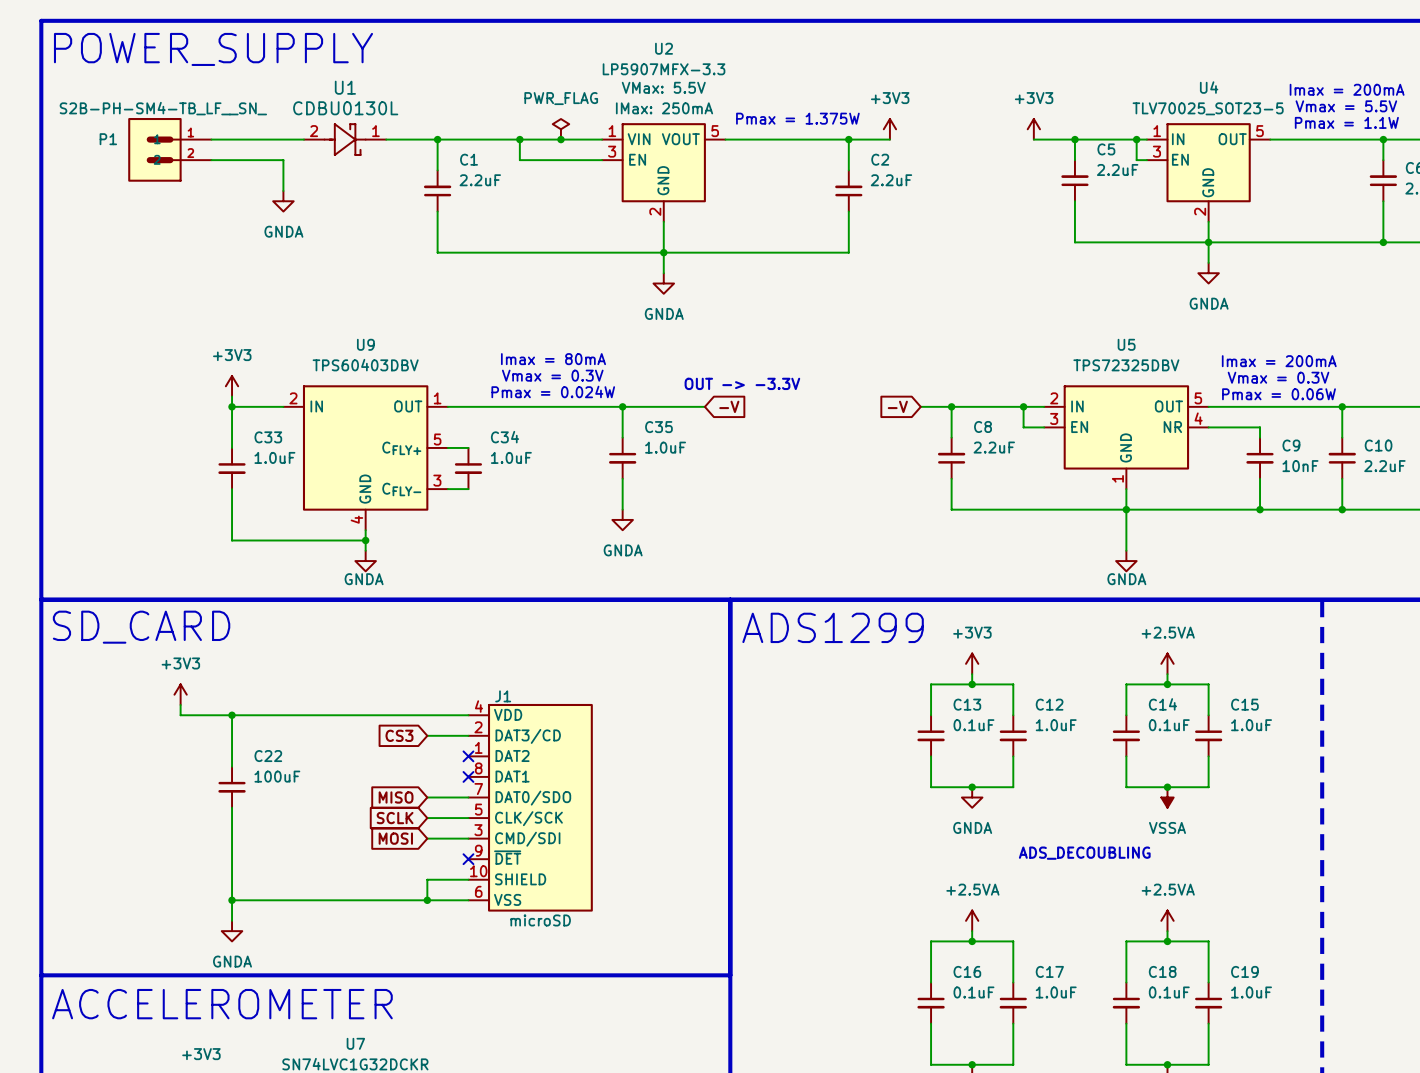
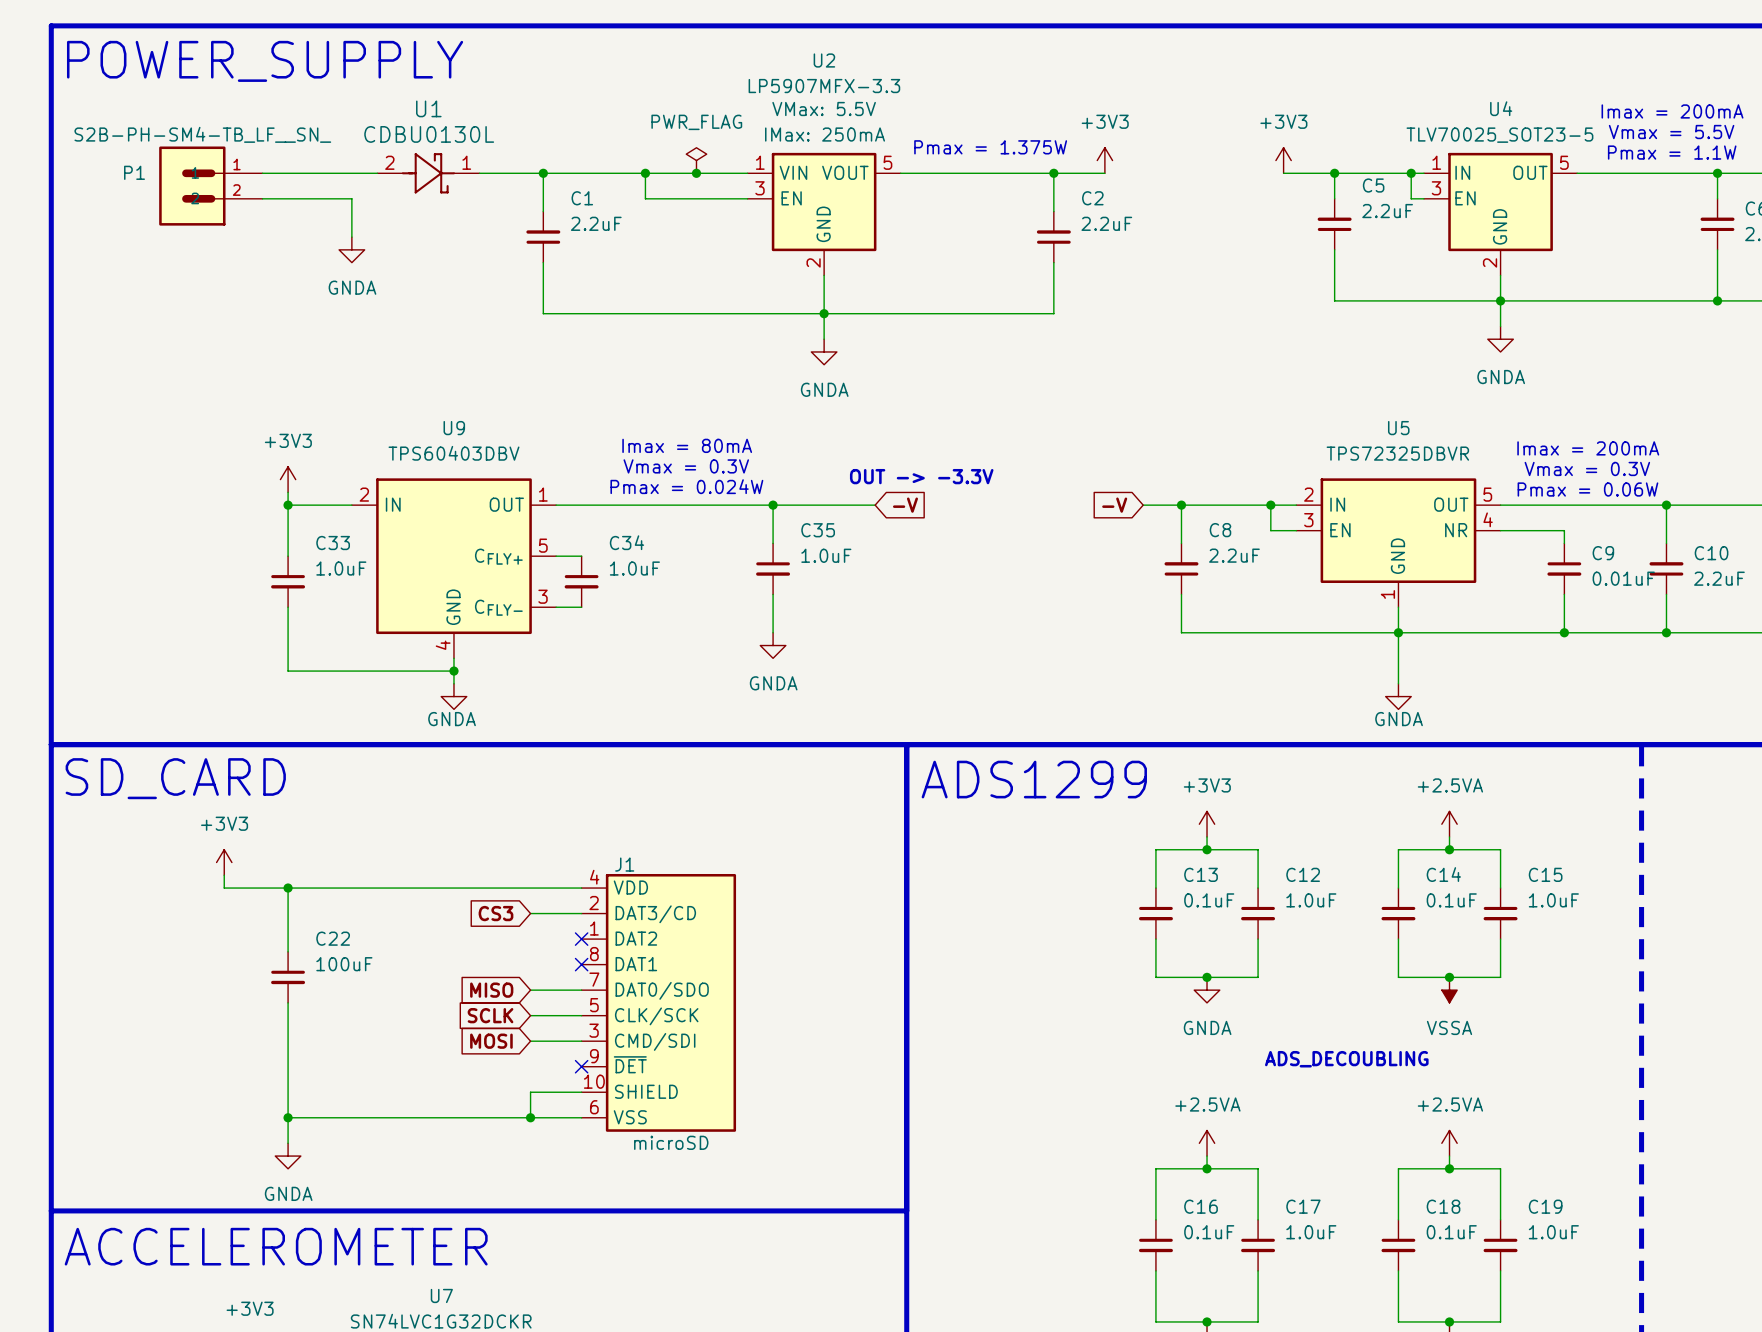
U5 value: TPS72325DBV (1126, 365) -> TPS72325DBVR (1397, 453)
C9 value: 10nF (1300, 466) -> 0.01uF (1623, 578)

